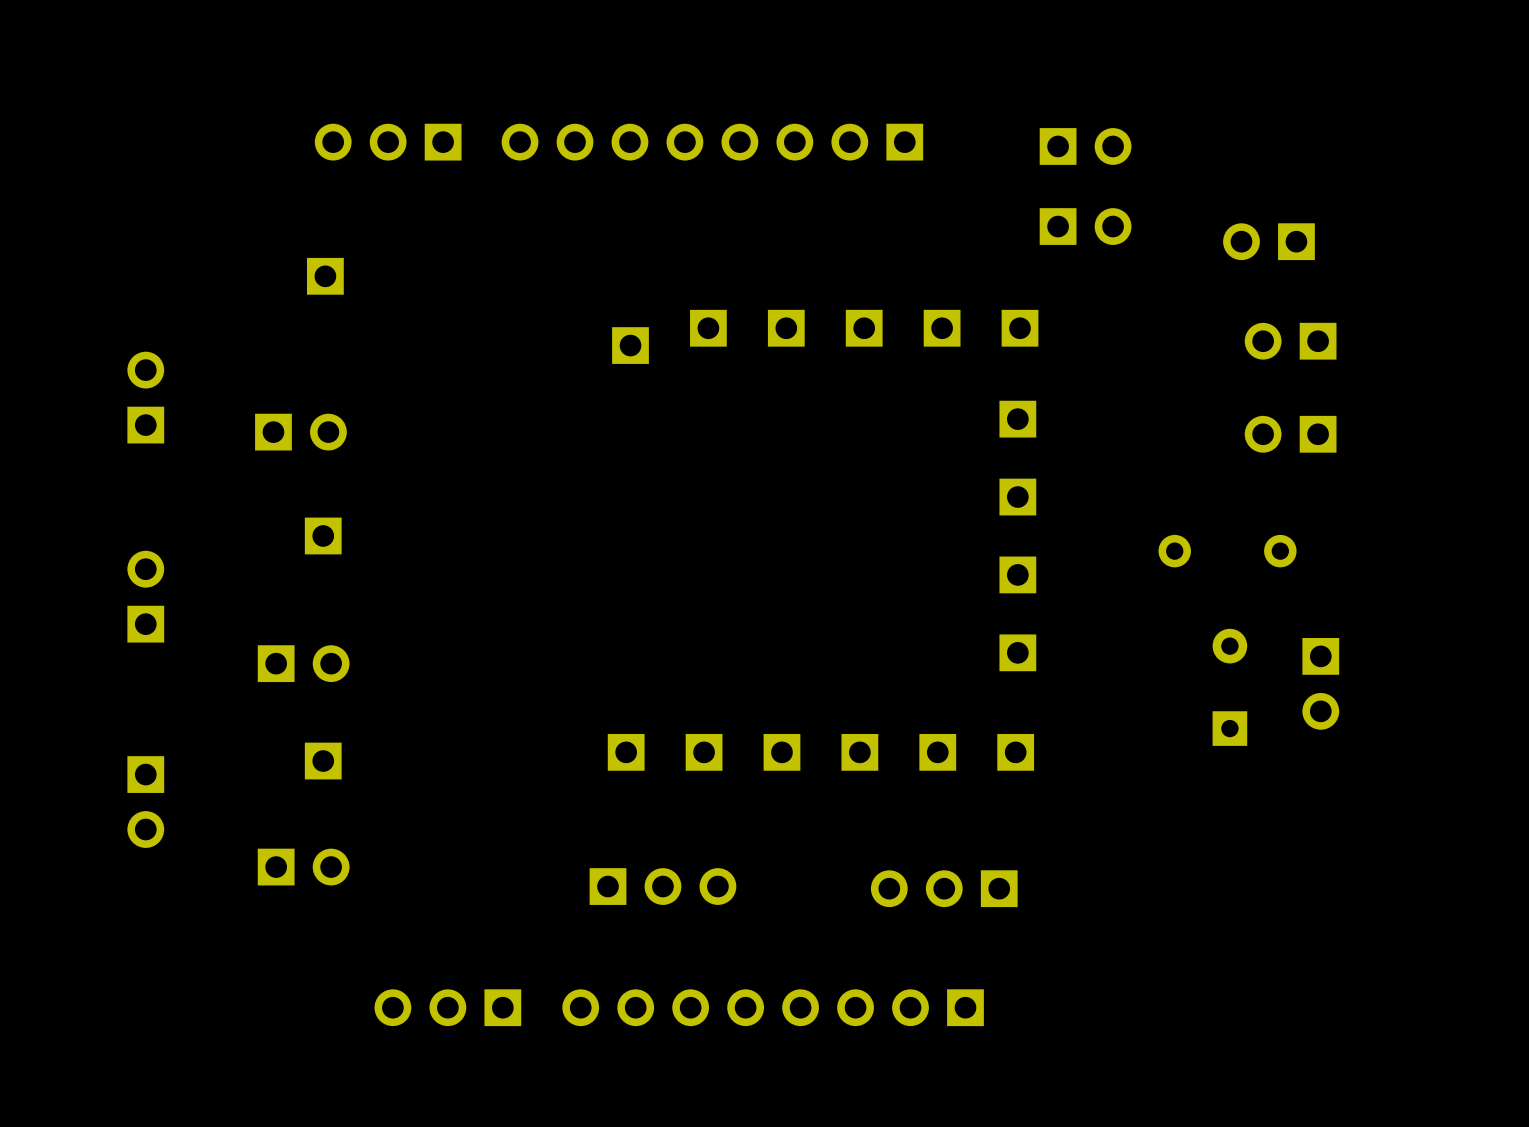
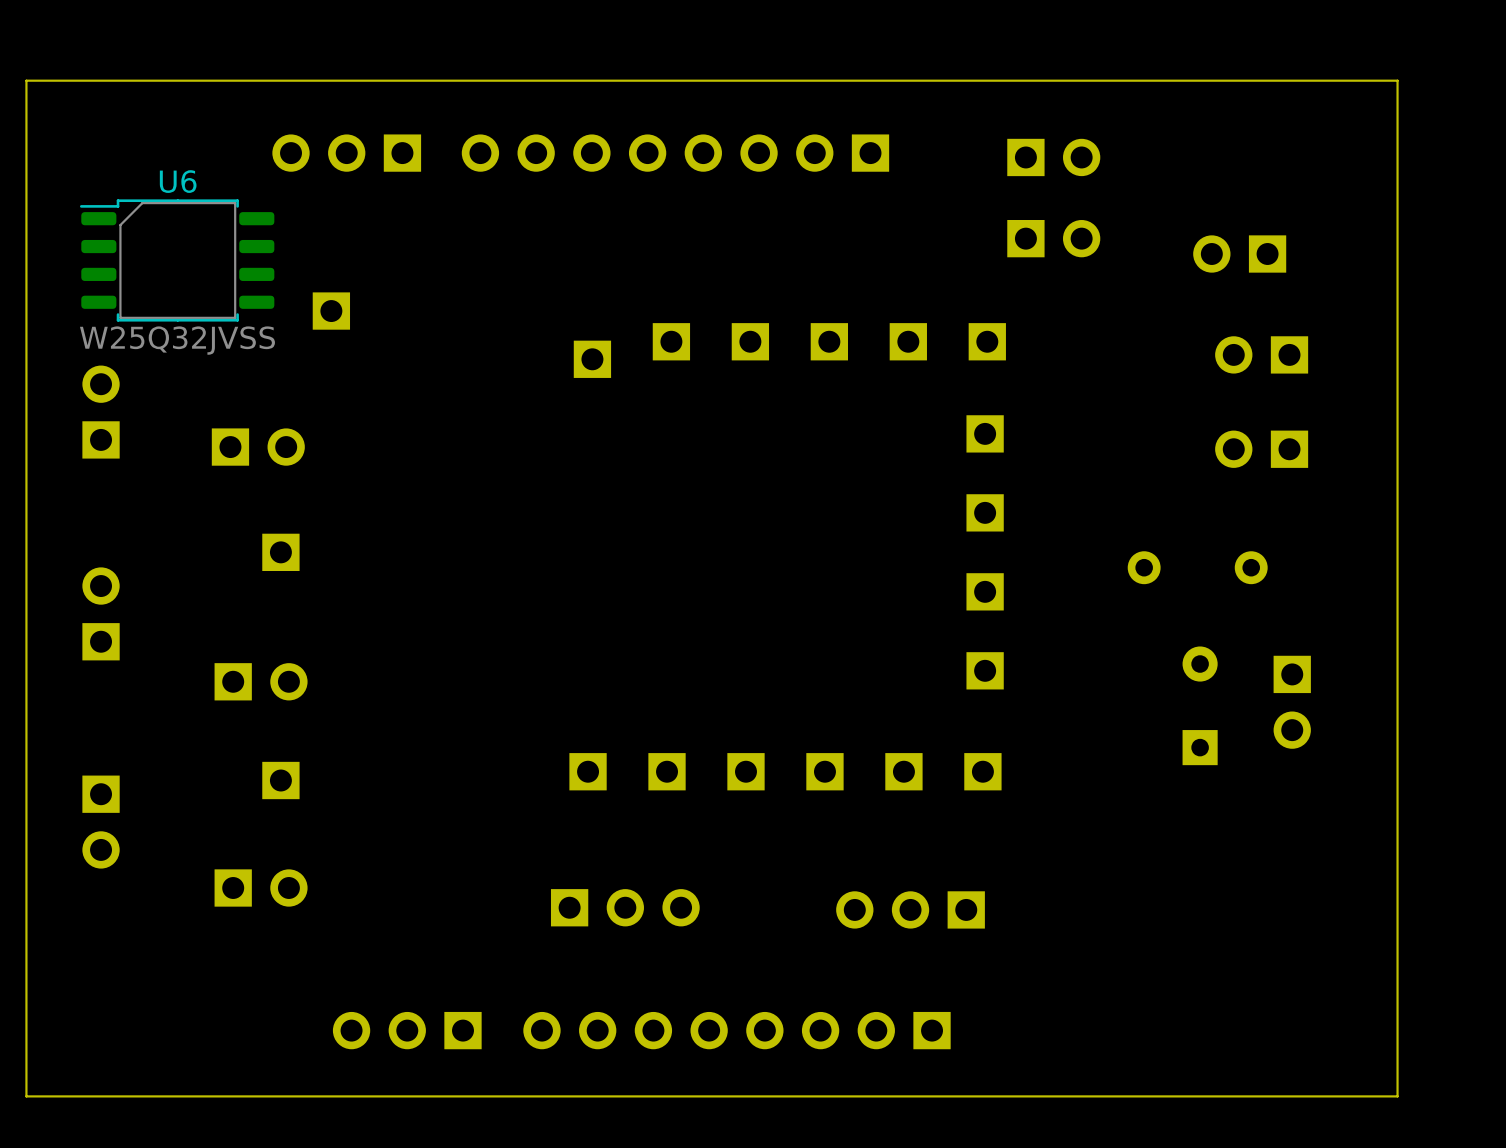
board edge: none -> (1397, 80) (26, 80) (26, 1096) (1397, 1096) (1397, 80)
U6: none -> W25Q32JVSS (177, 260)
part position: (325, 276) -> (331, 311)

